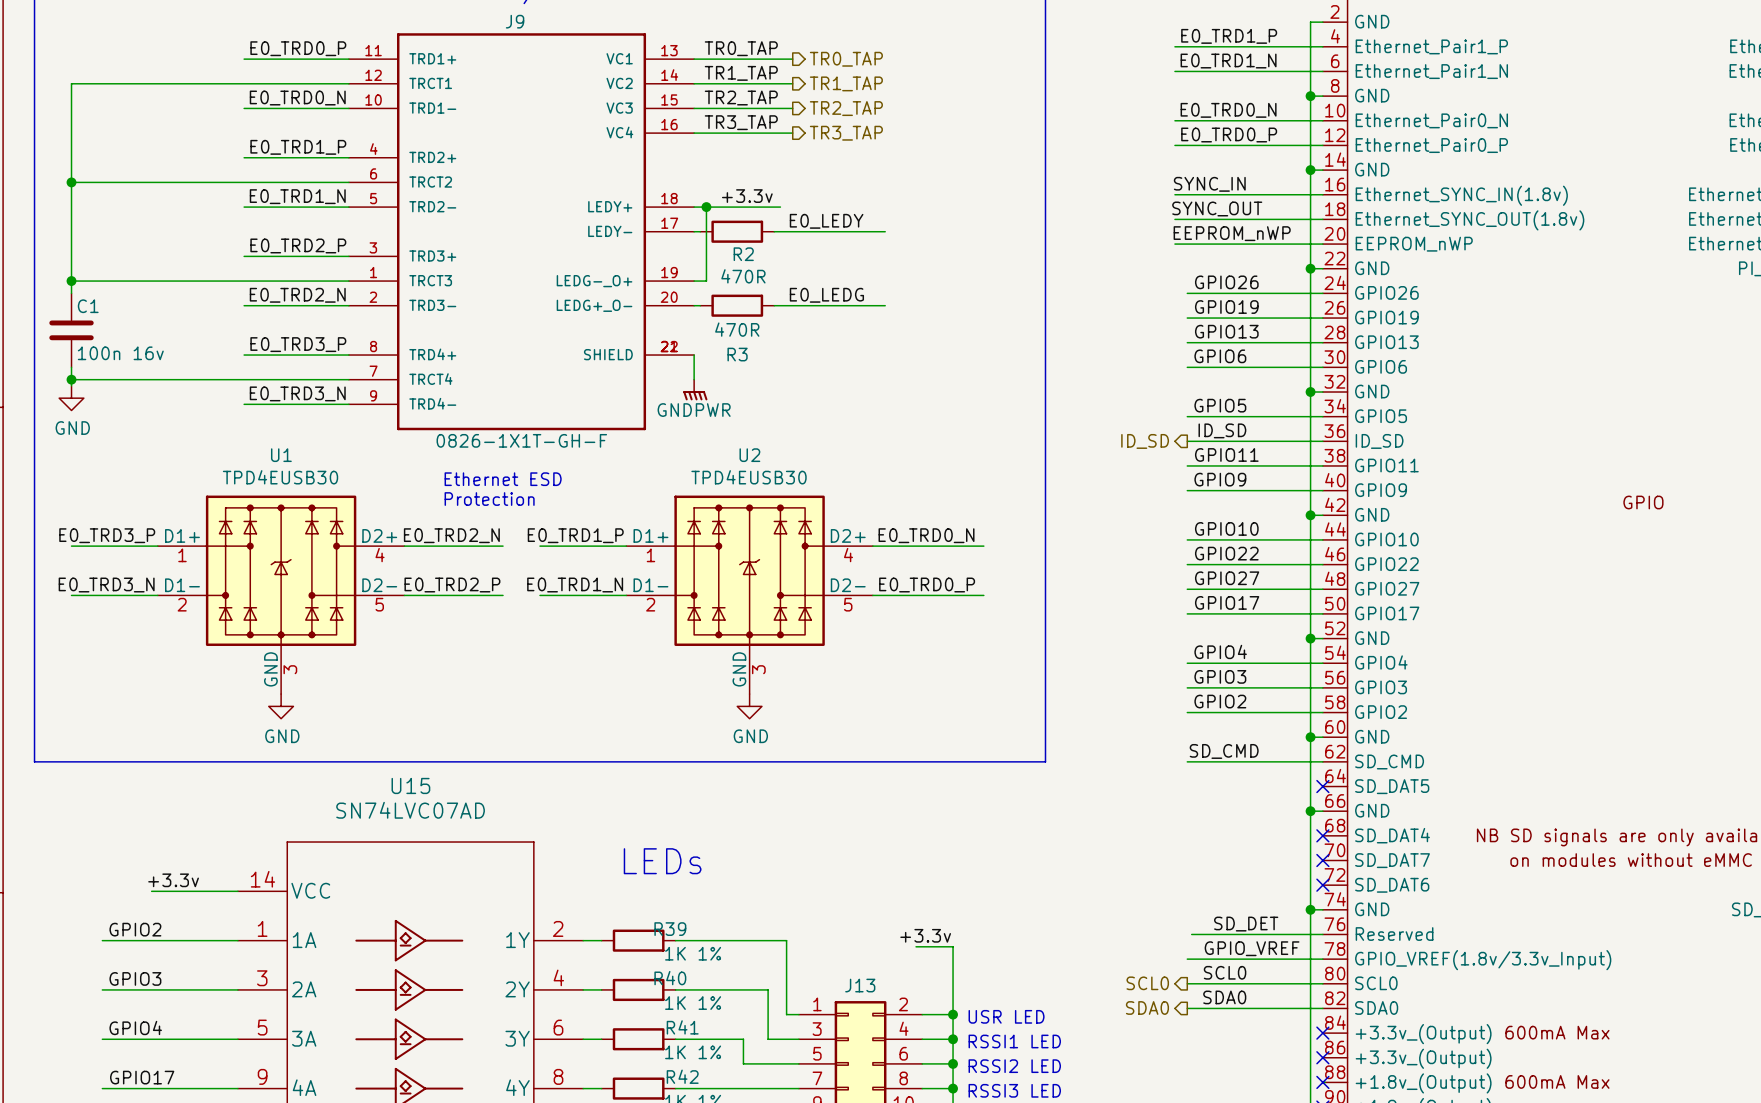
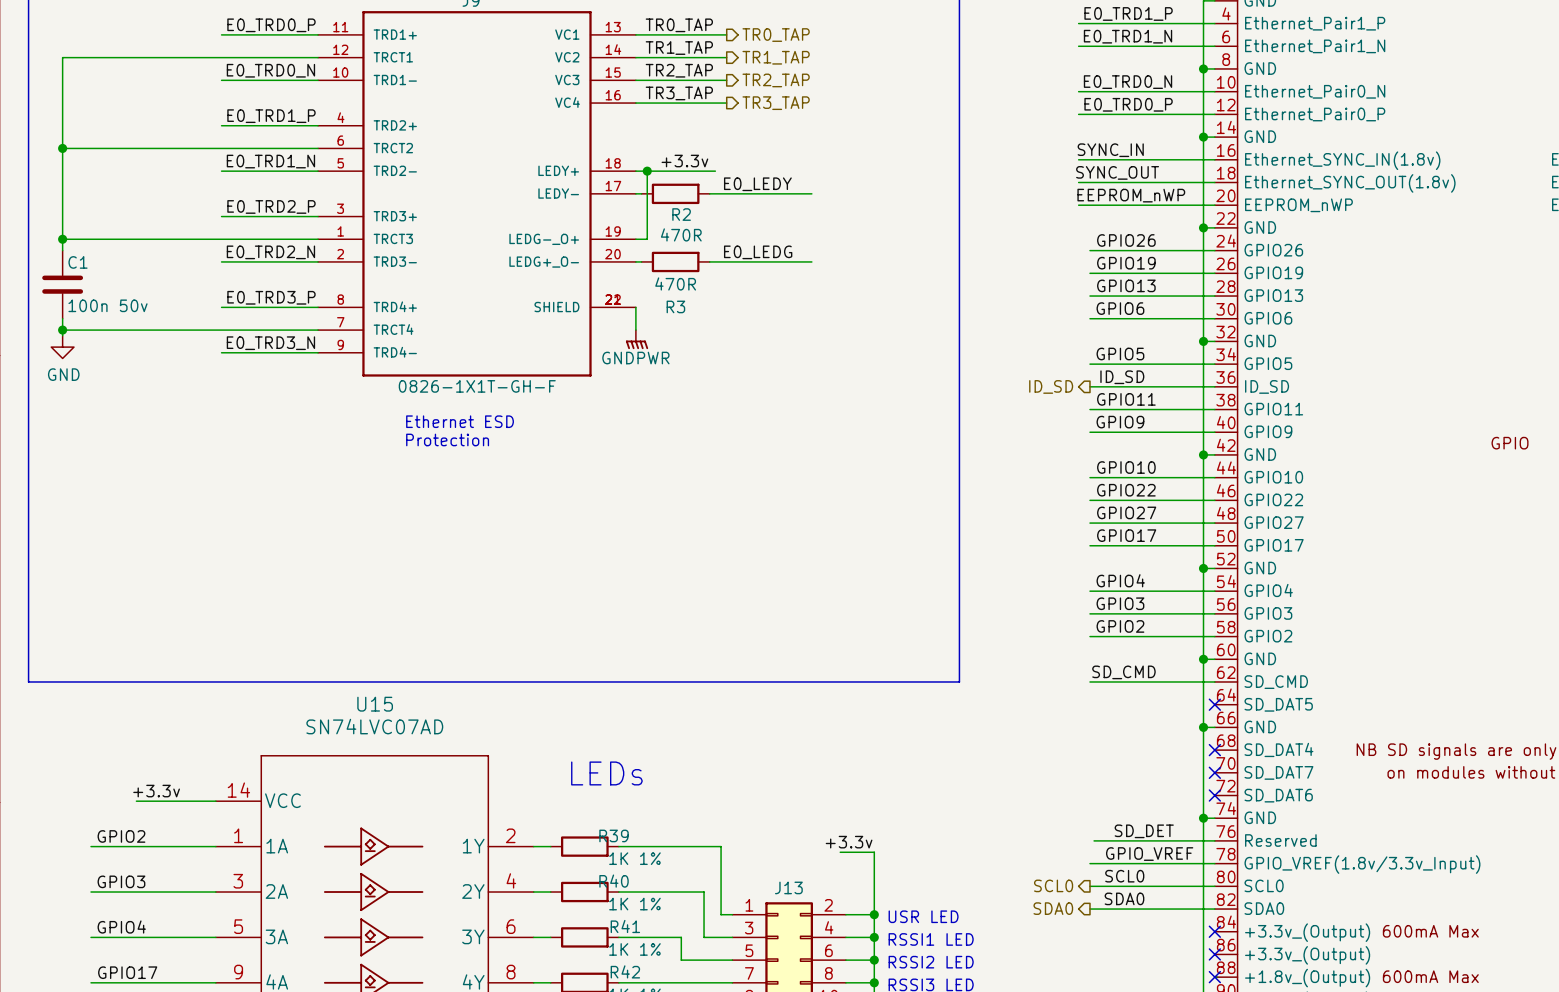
C1 value: 100n 16v (120, 353) -> 100n 50v (108, 305)
label: E0_TRD3_P (107, 535) -> none
label: E0_TRD2_N (451, 535) -> none
label: E0_TRD1_P (575, 535) -> none
label: E0_TRD0_N (926, 535) -> none
wire: (71, 546) (157, 546) -> none
wire: (404, 546) (503, 546) -> none
wire: (540, 546) (626, 546) -> none
wire: (872, 546) (983, 546) -> none
label: E0_TRD3_N (106, 585) -> none
label: E0_TRD2_P (452, 585) -> none
label: E0_TRD1_N (575, 585) -> none
label: E0_TRD0_P (927, 585) -> none
U1: TPD4EUSB30 (281, 594) -> none
U2: TPD4EUSB30 (749, 594) -> none
wire: (71, 595) (157, 595) -> none
wire: (404, 595) (503, 595) -> none
wire: (540, 595) (626, 595) -> none
wire: (872, 595) (983, 595) -> none
power symbol: GND (281, 706) -> none
power symbol: GND (749, 706) -> none

